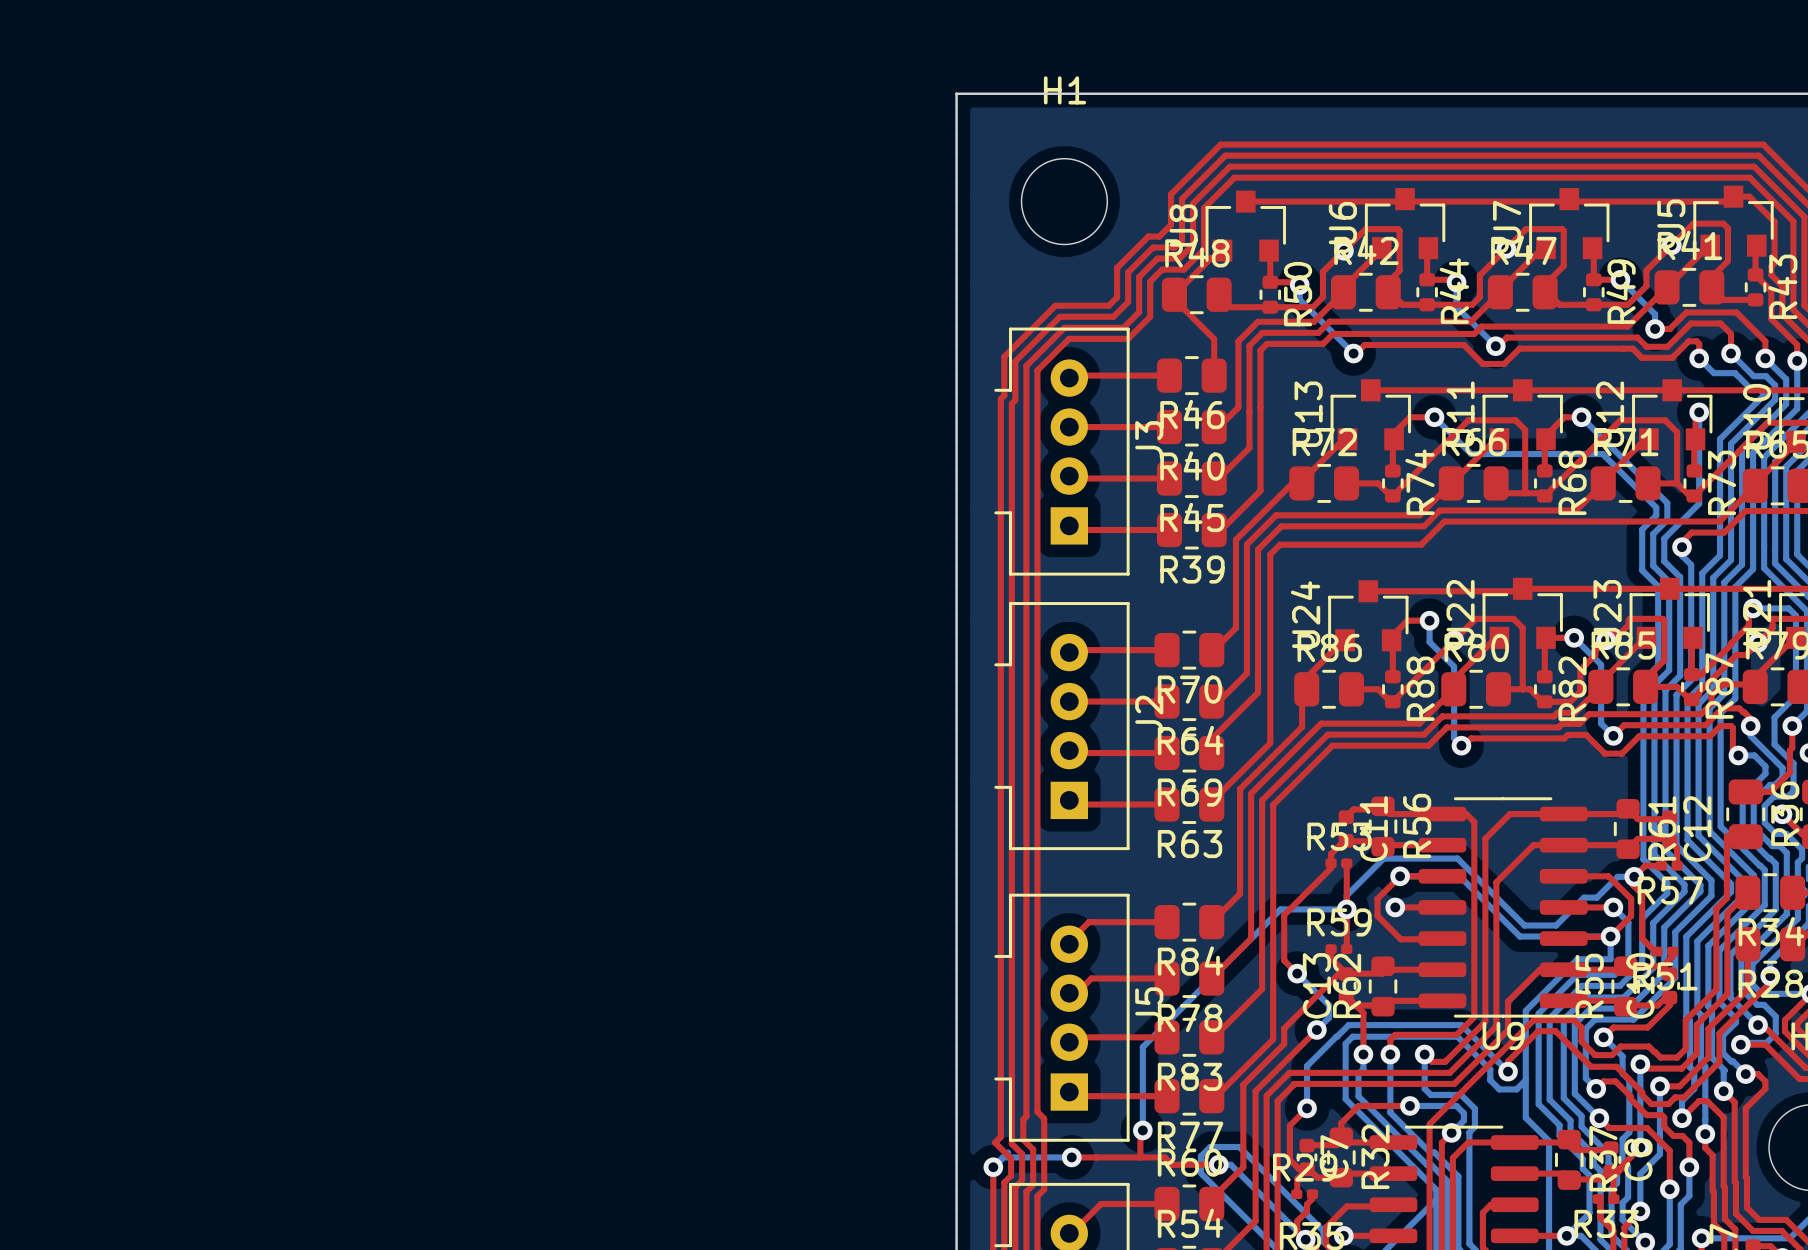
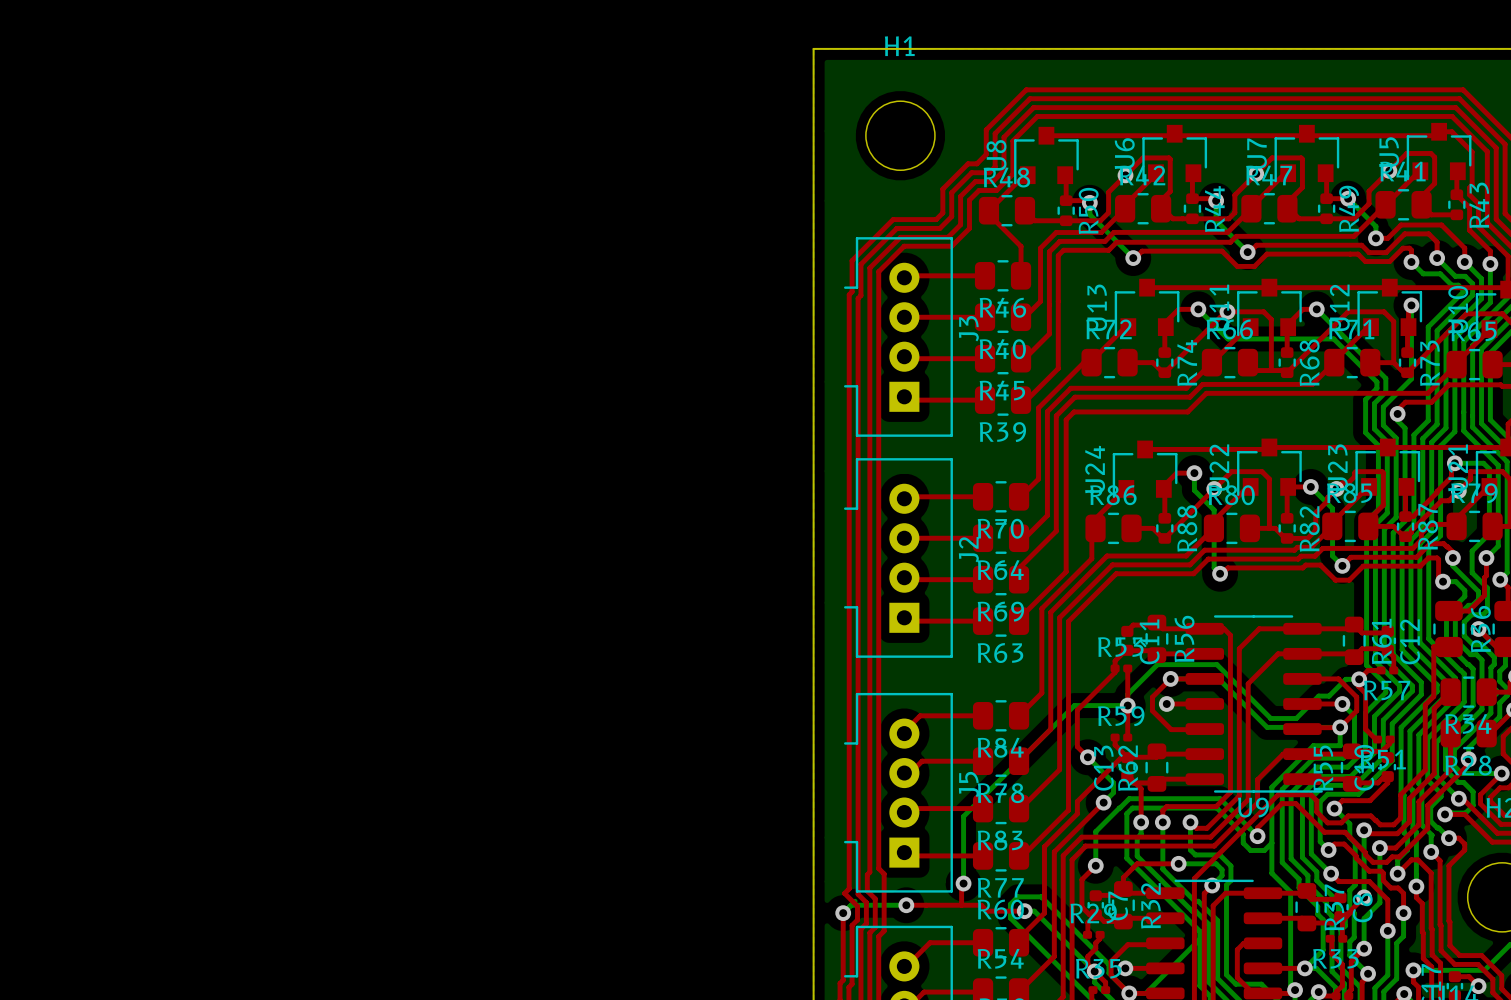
via: none -> (1227, 311)

